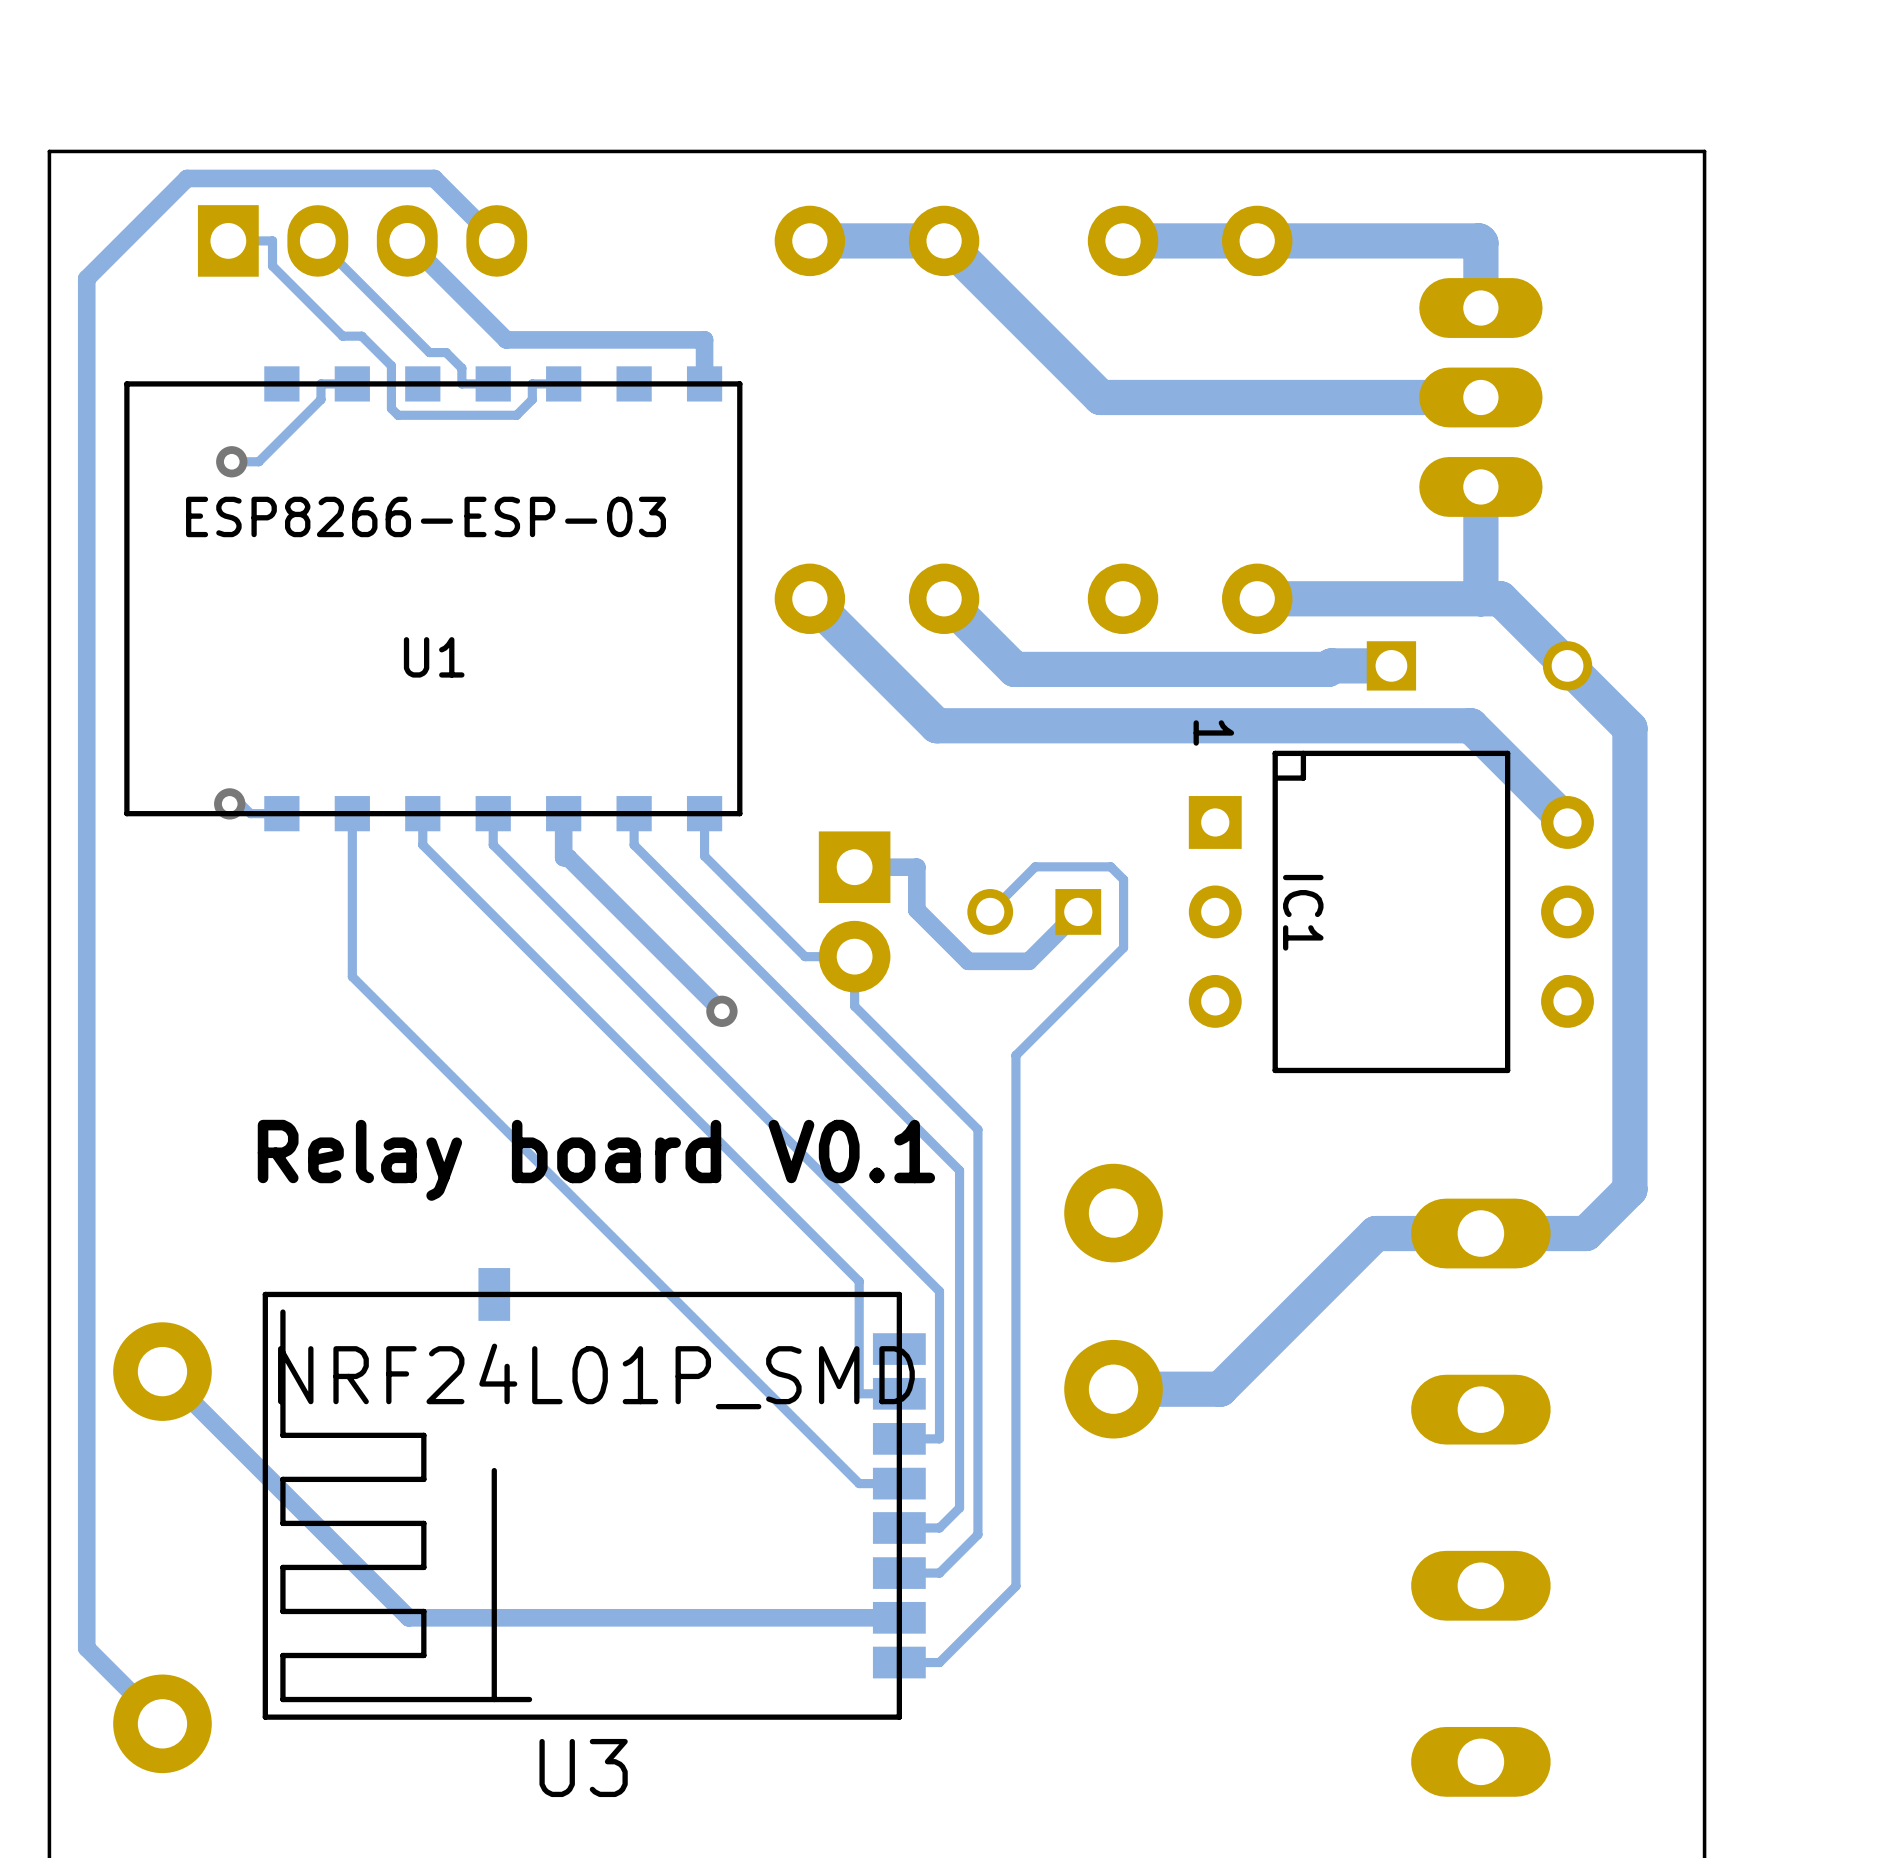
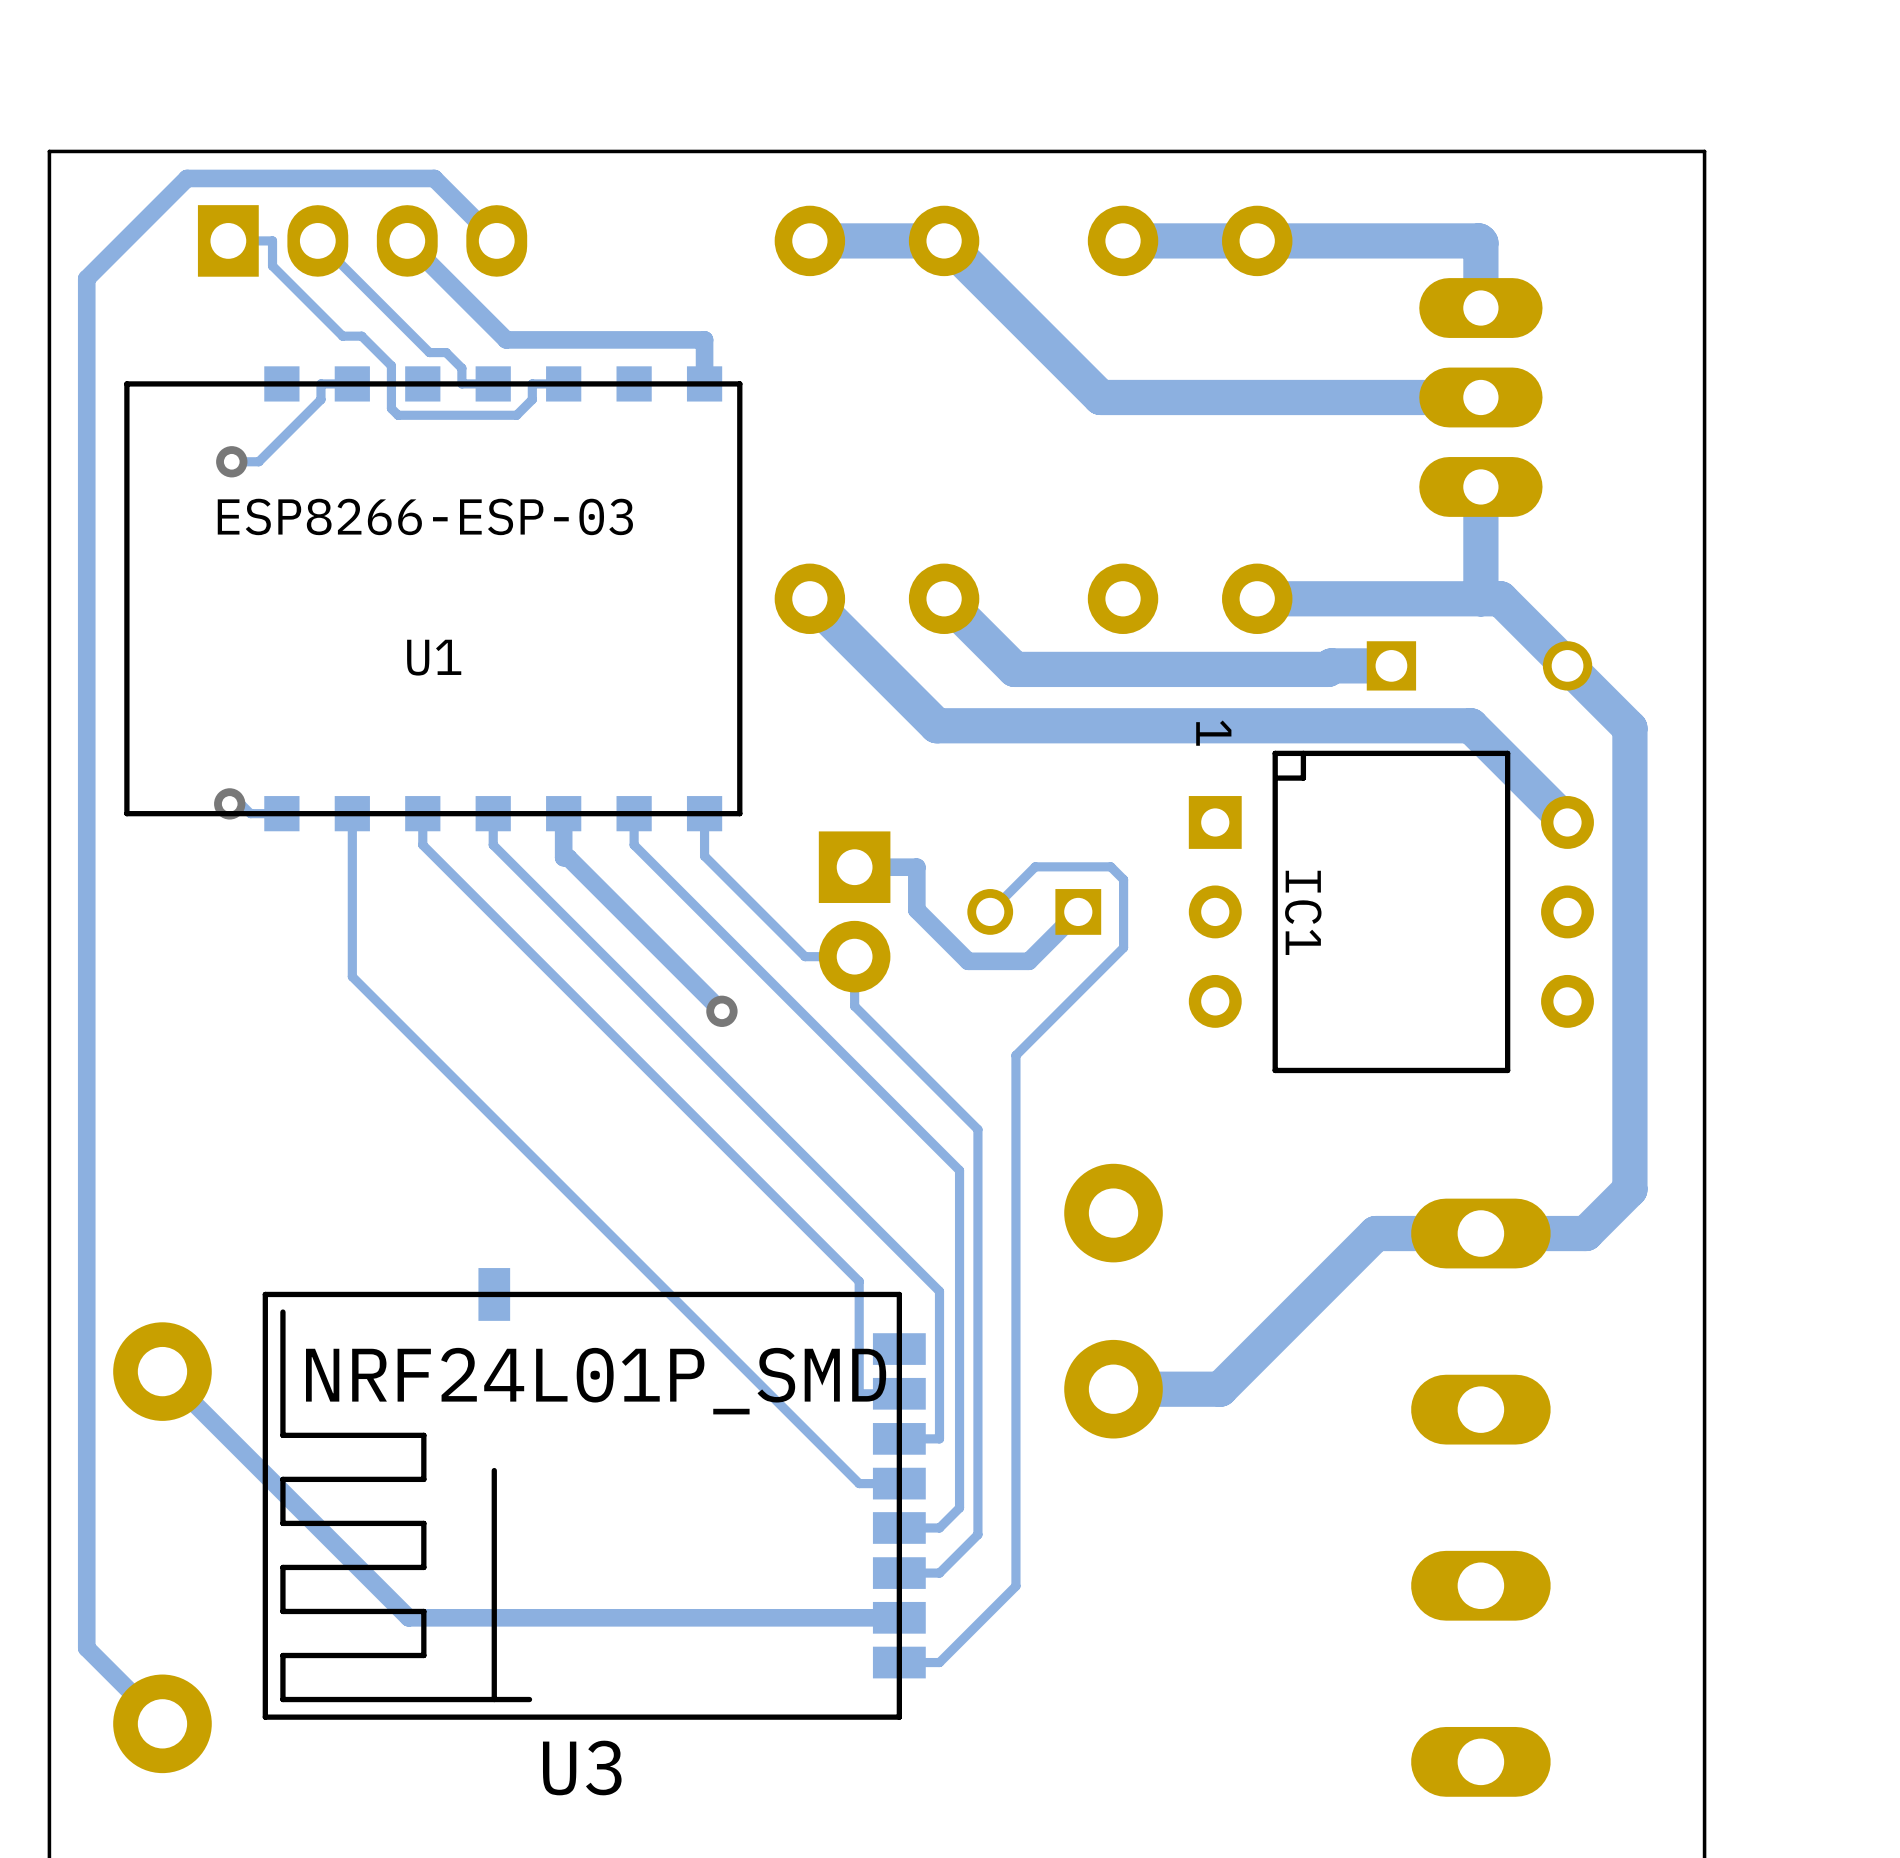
text: Relay board V0.1 (596, 1160) -> none

